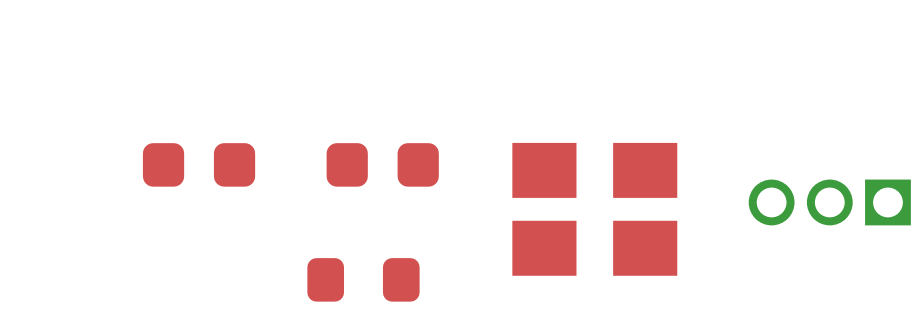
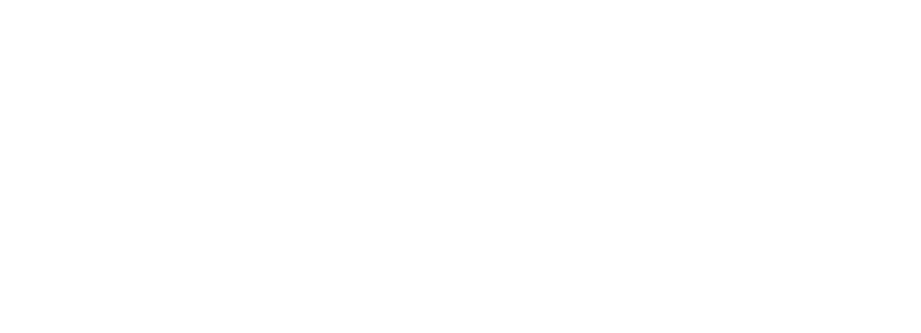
part: (199, 164) -> none
part: (382, 164) -> none
part: (829, 202) -> none
part: (594, 209) -> none
part: (363, 279) -> none

